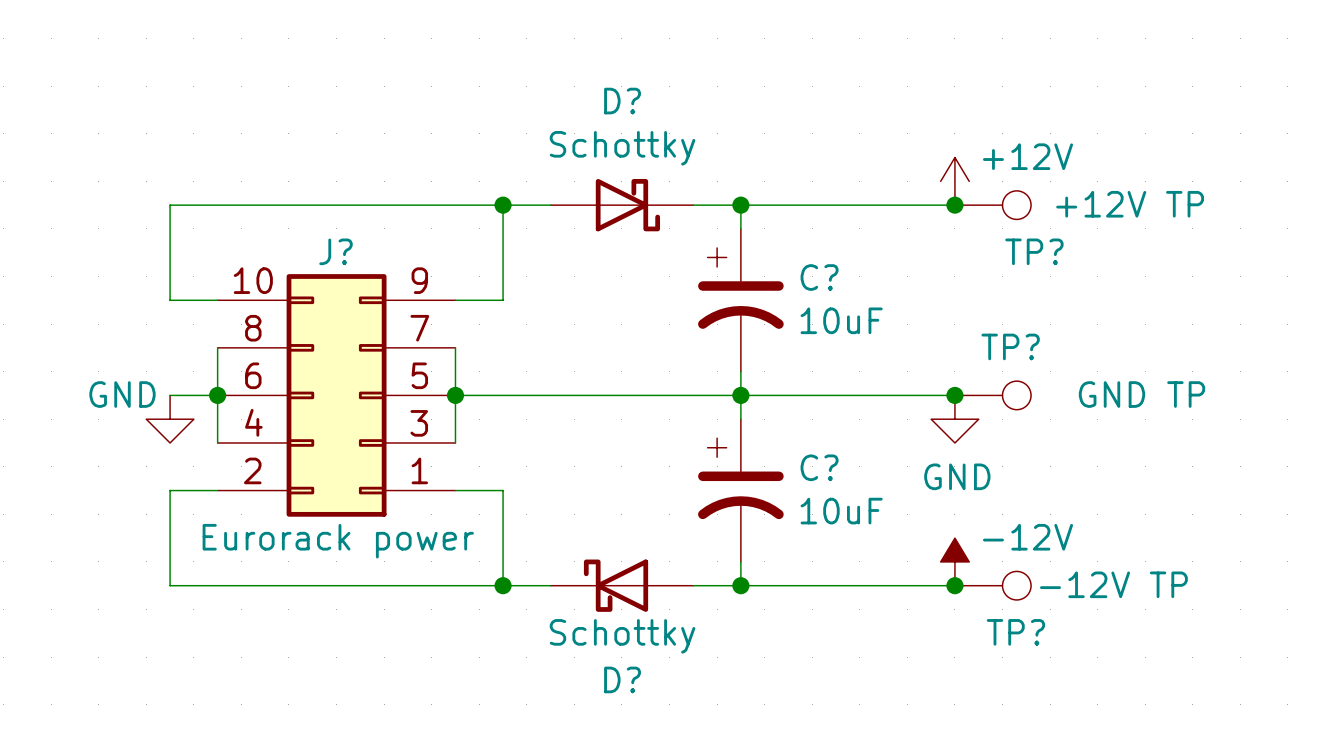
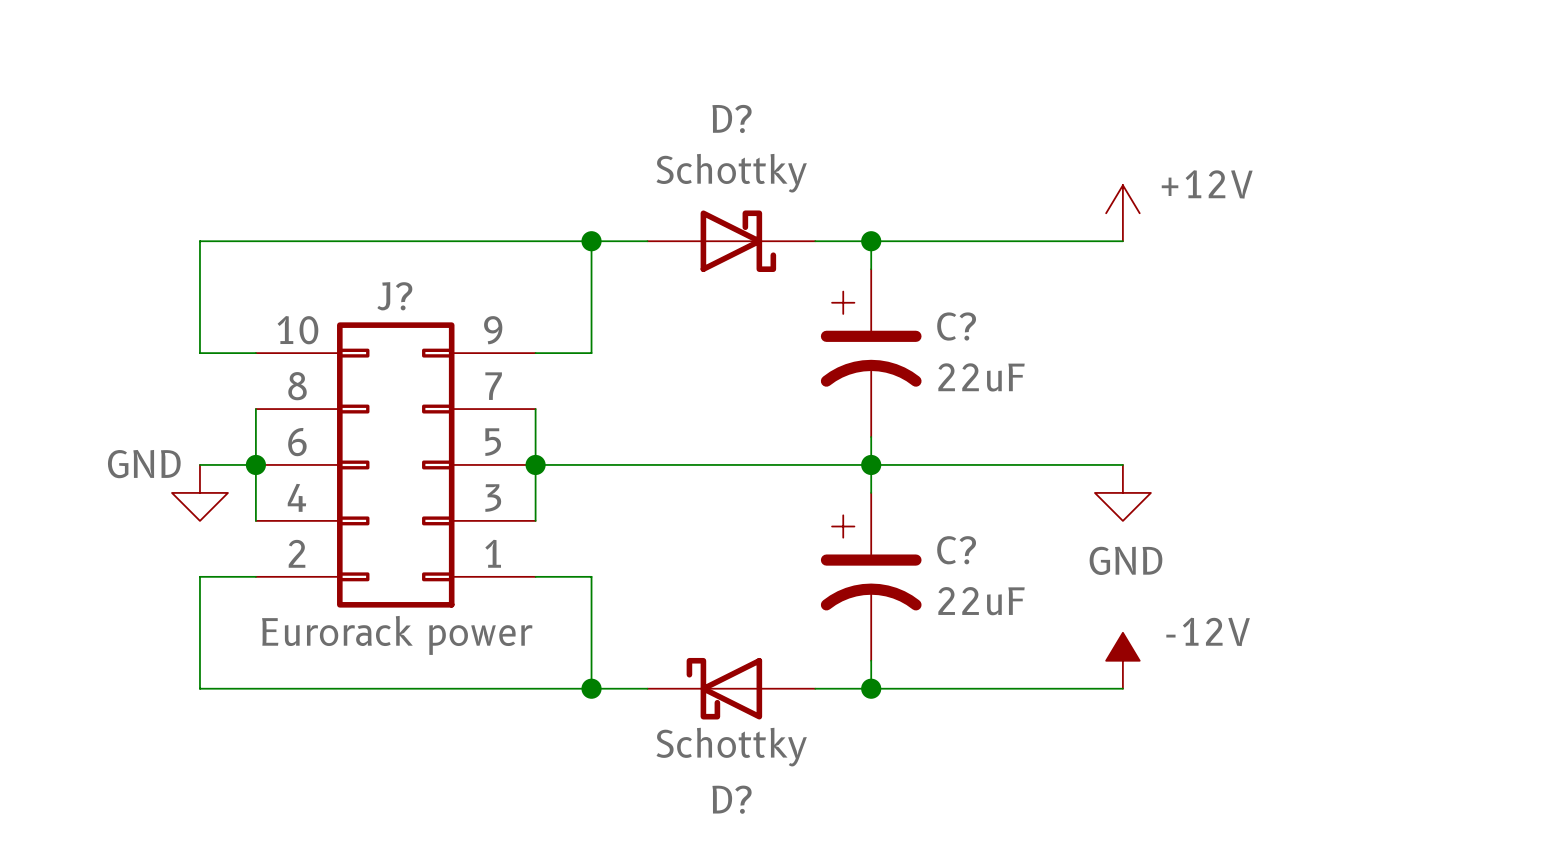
junction: (954, 205) -> none
TP?: +12V TP (993, 205) -> none
C? value: 10uF (841, 320) -> 22uF (981, 377)
junction: (954, 395) -> none
TP?: GND TP (993, 395) -> none
C? value: 10uF (841, 511) -> 22uF (981, 601)
junction: (954, 585) -> none
TP?: -12V TP (993, 585) -> none

